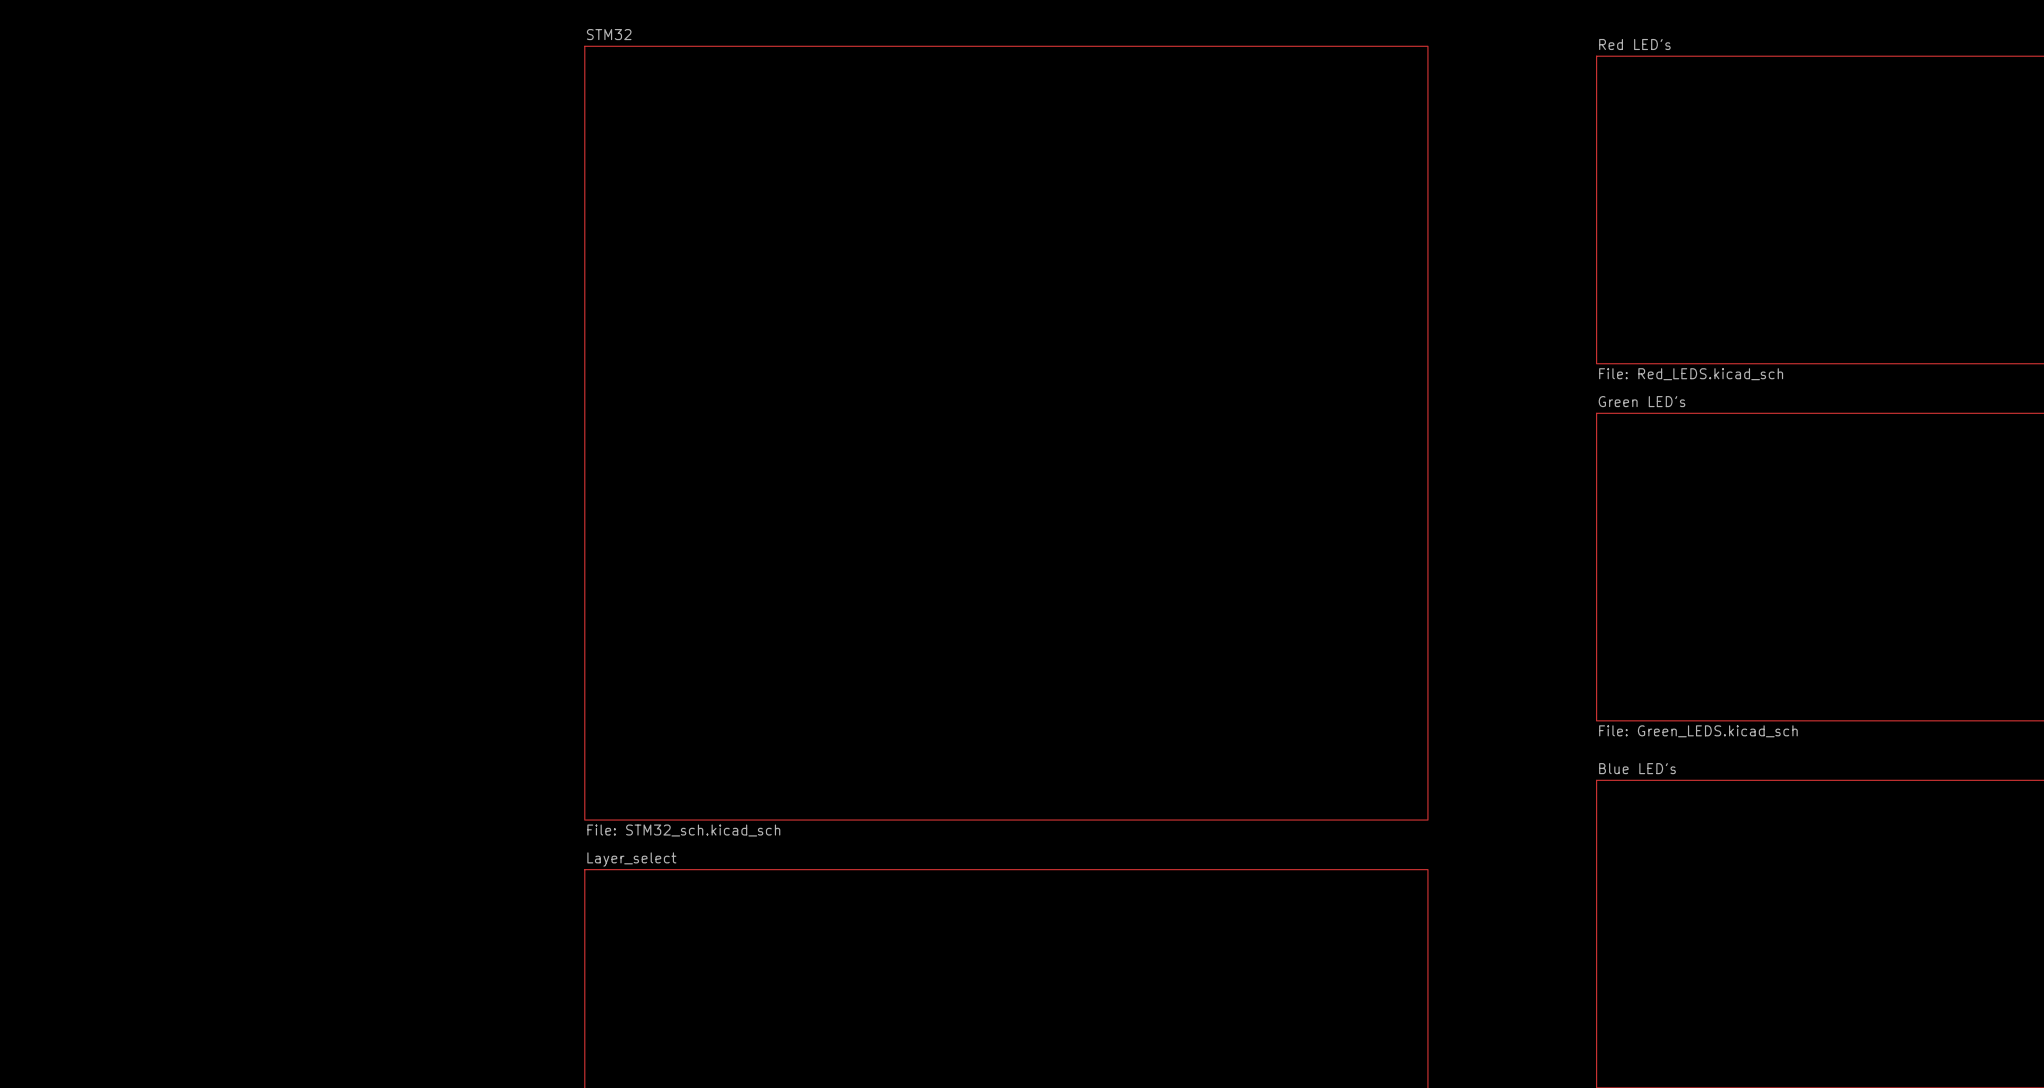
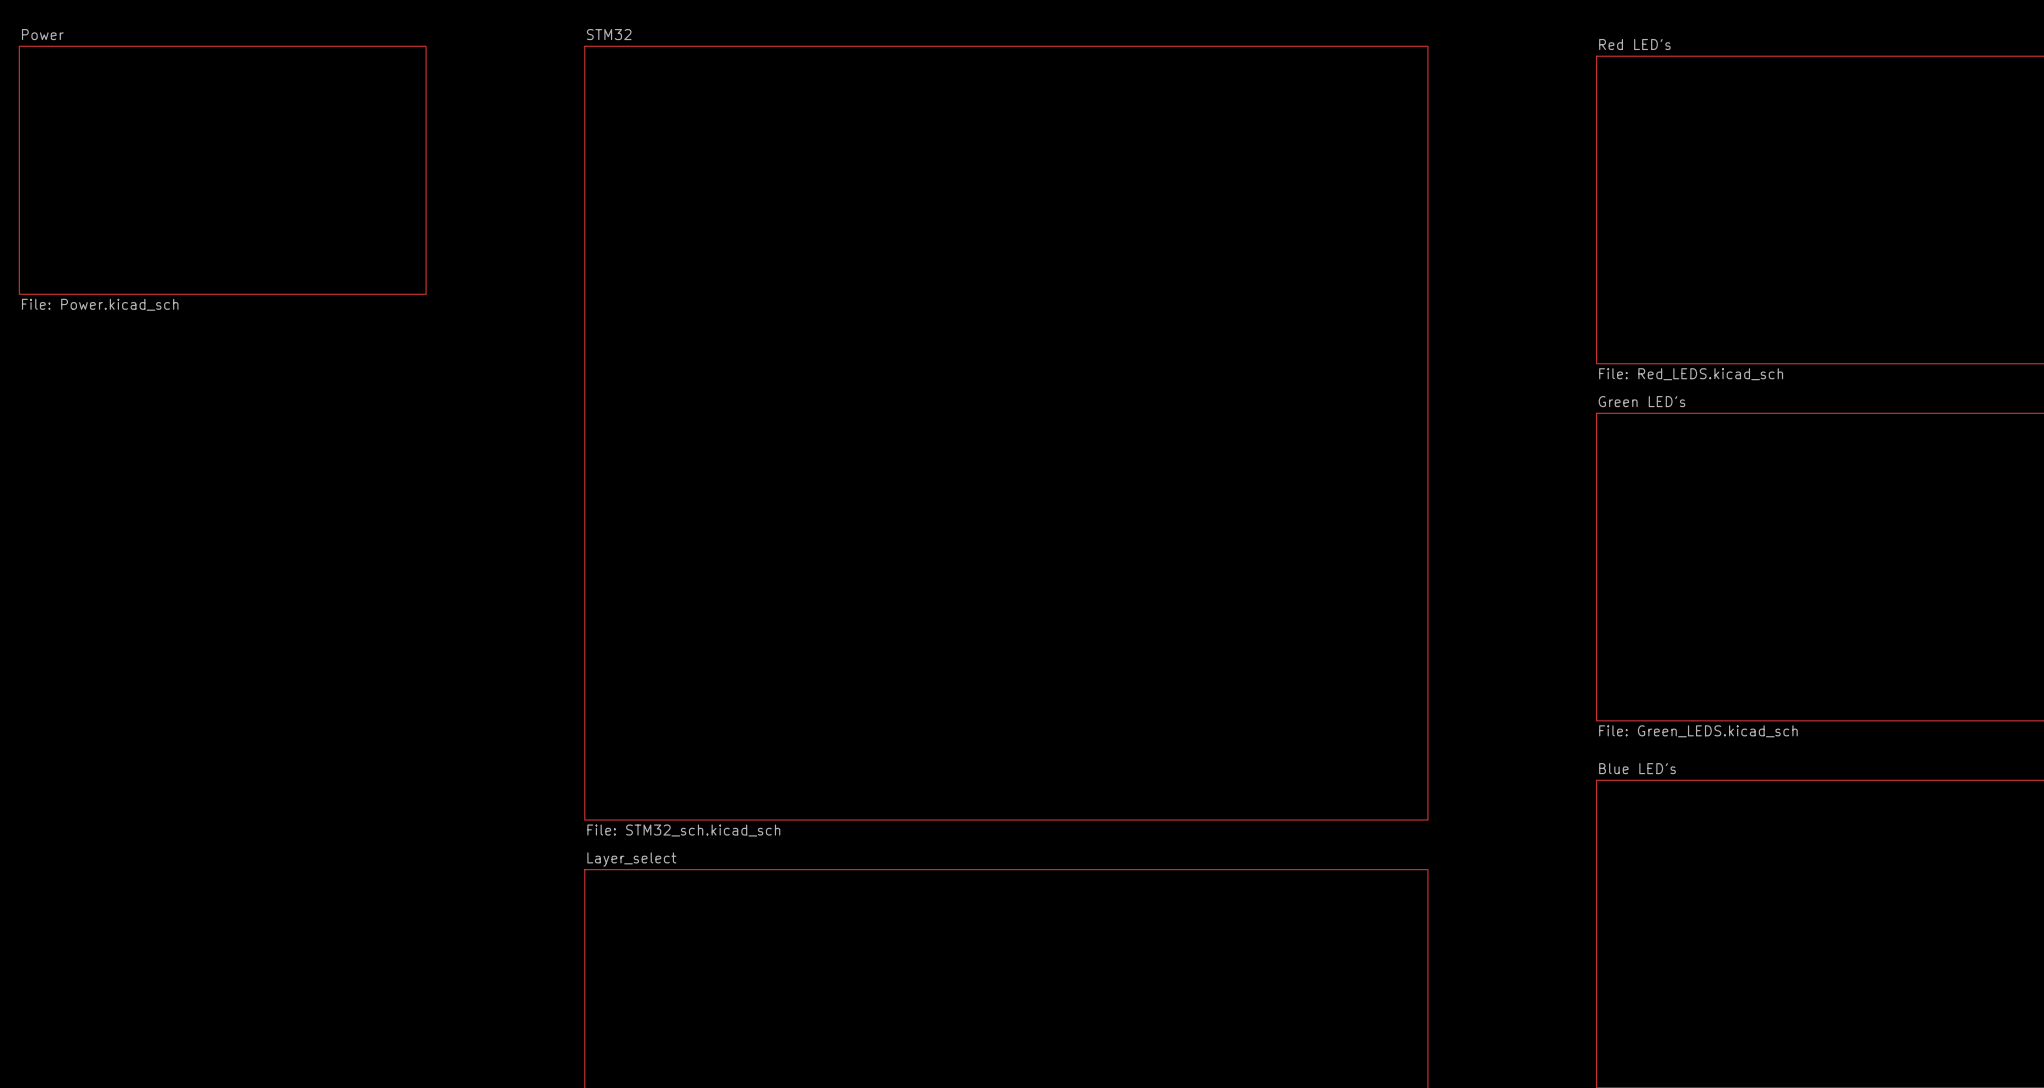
sheet Power: none -> File: Power.kicad_sch (222, 170)

